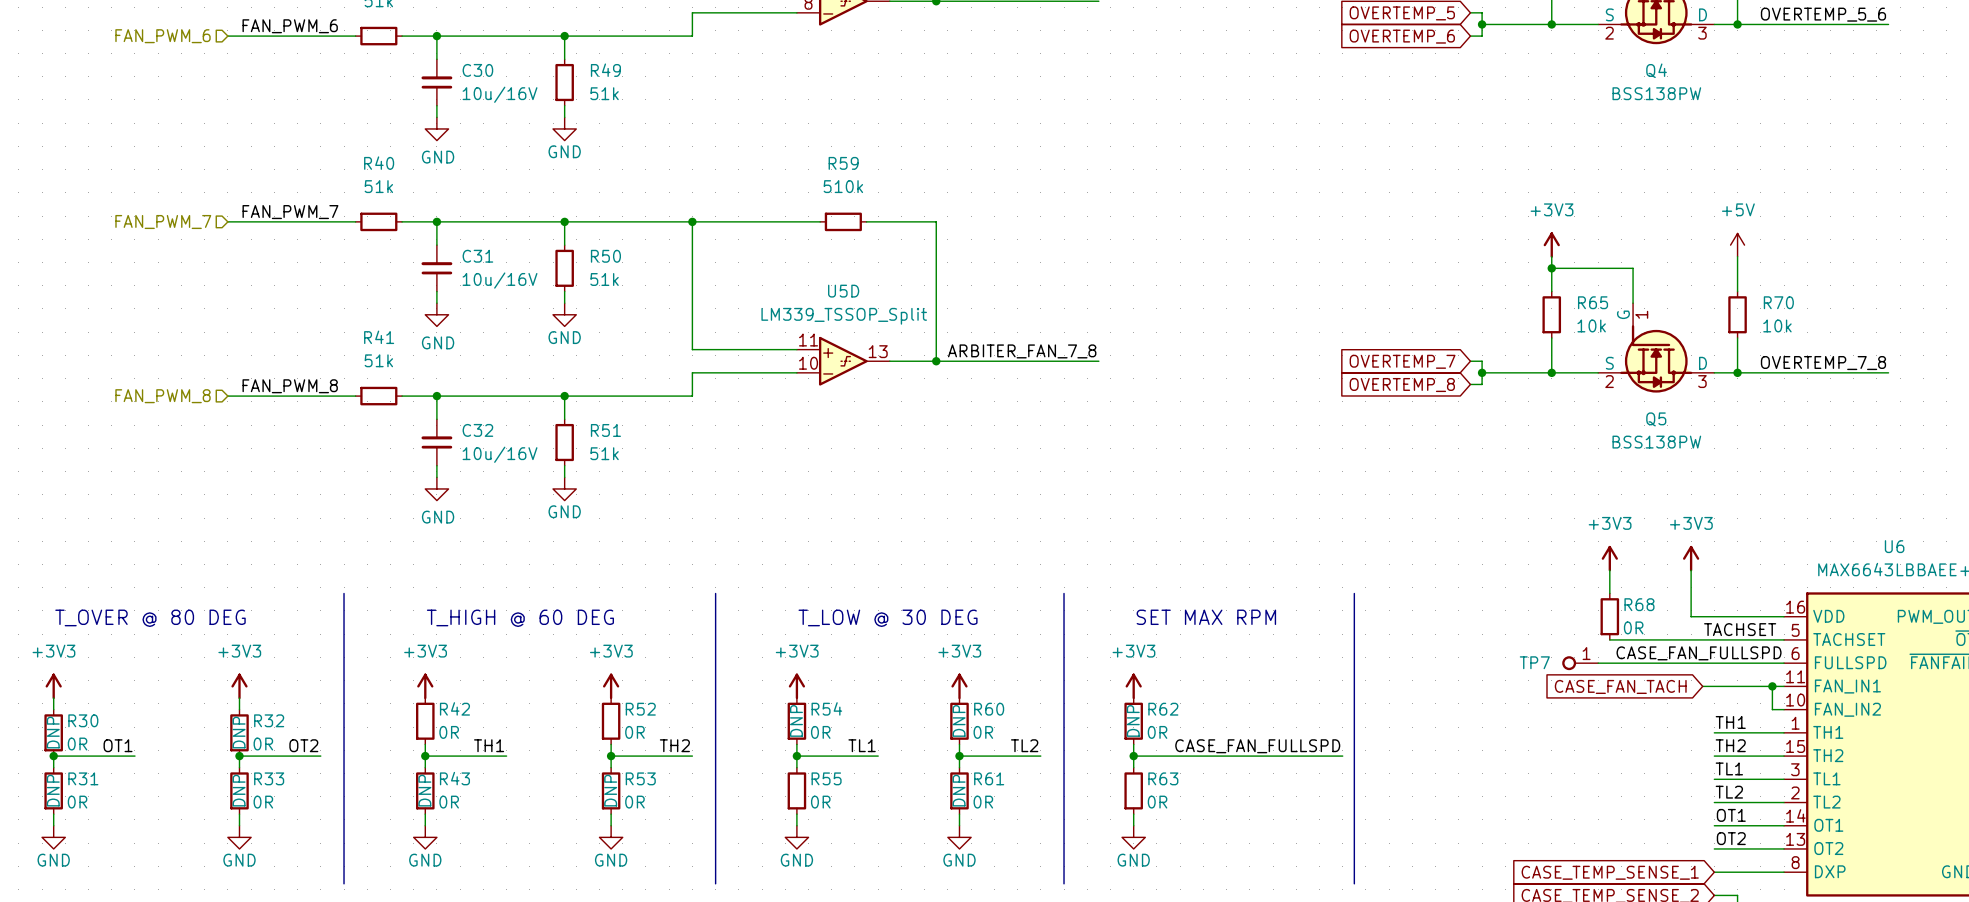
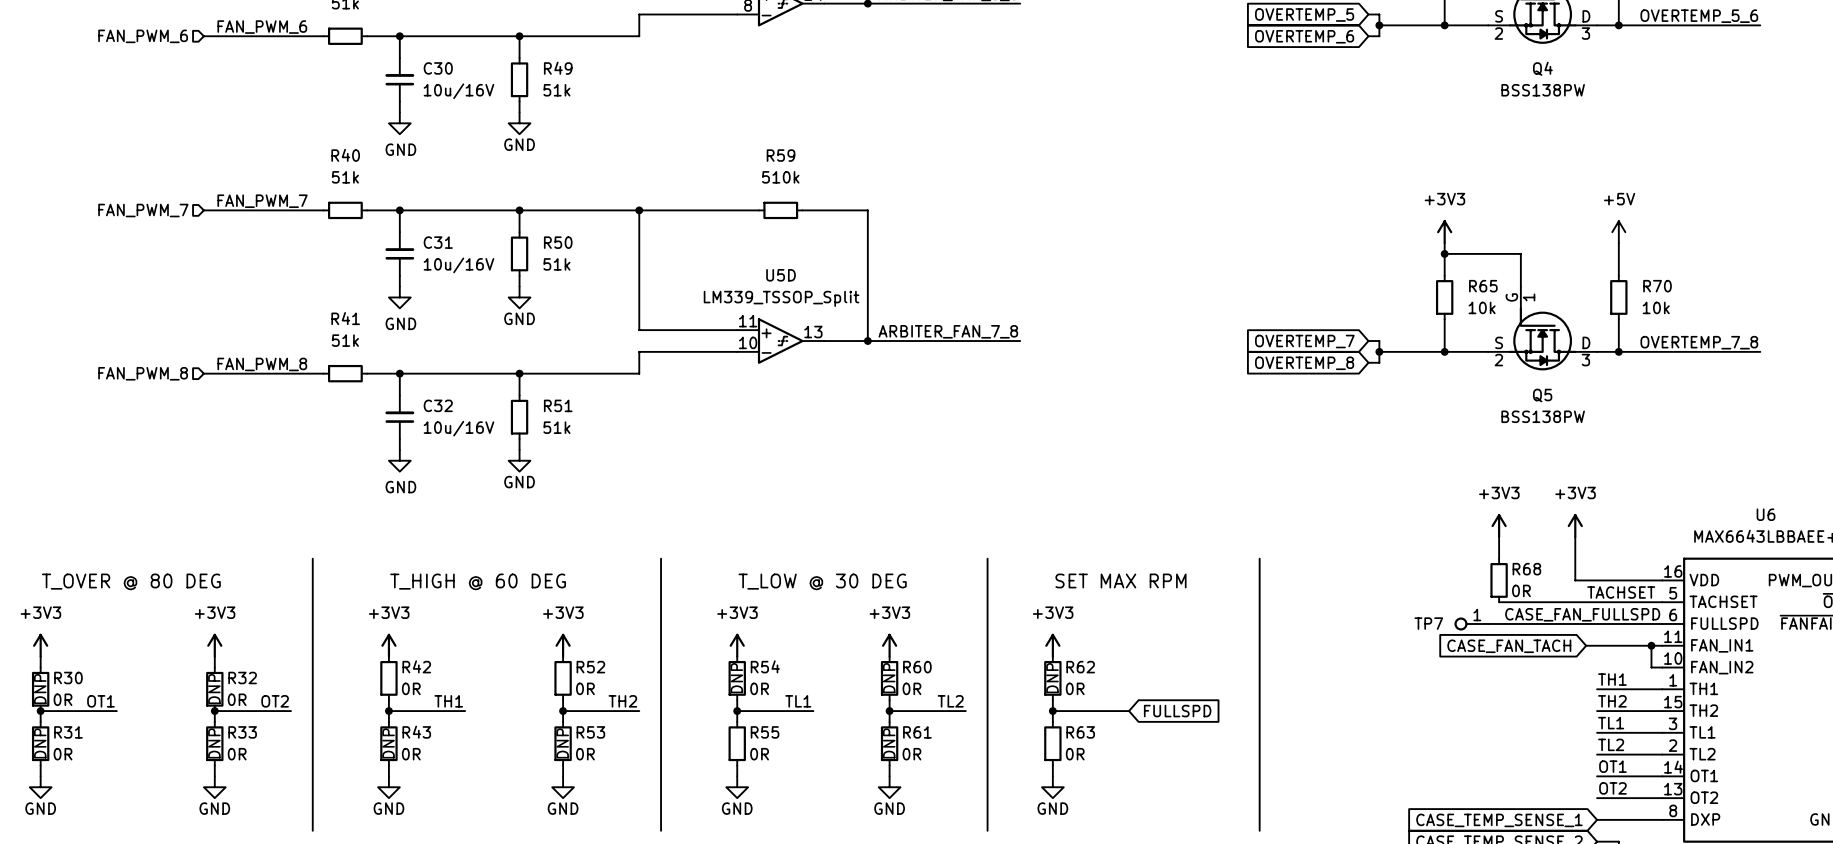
label: CASE_FAN_FULLSPD (1257, 746) -> none
wire: (1214, 756) (1342, 756) -> none
global label: none -> FULLSPD (1177, 711)

